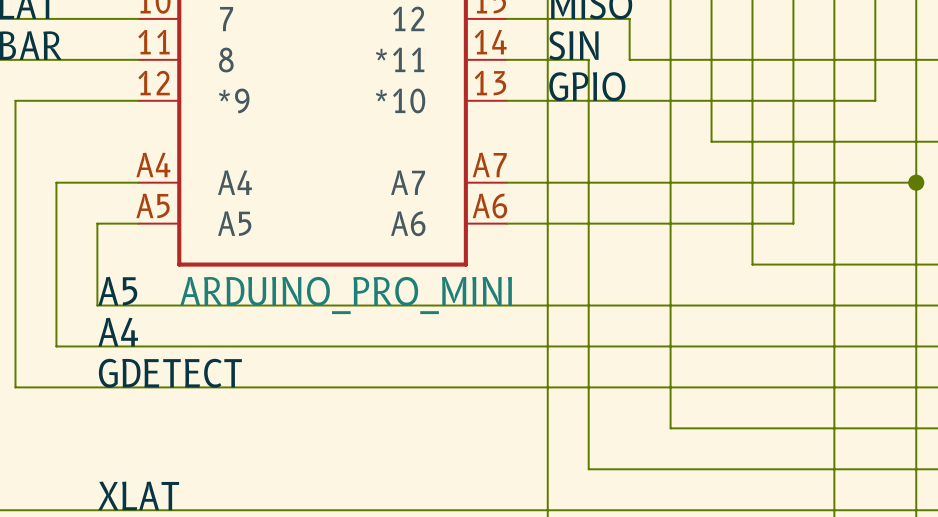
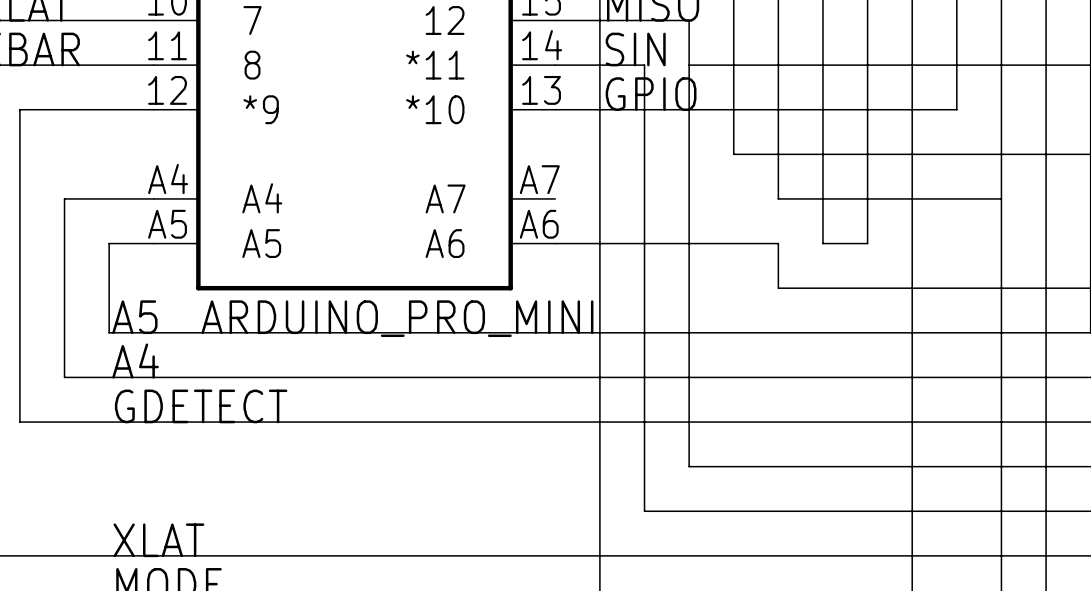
wire: (670, 141) (670, 428) -> (689, 65) (689, 466) (733, 466)
wire: (506, 182) (711, 182) -> (733, 154) (778, 154) (778, 198)
junction: (916, 182) -> none
wire: (711, 223) (752, 223) (752, 264) -> (778, 243) (778, 288) (822, 288)

